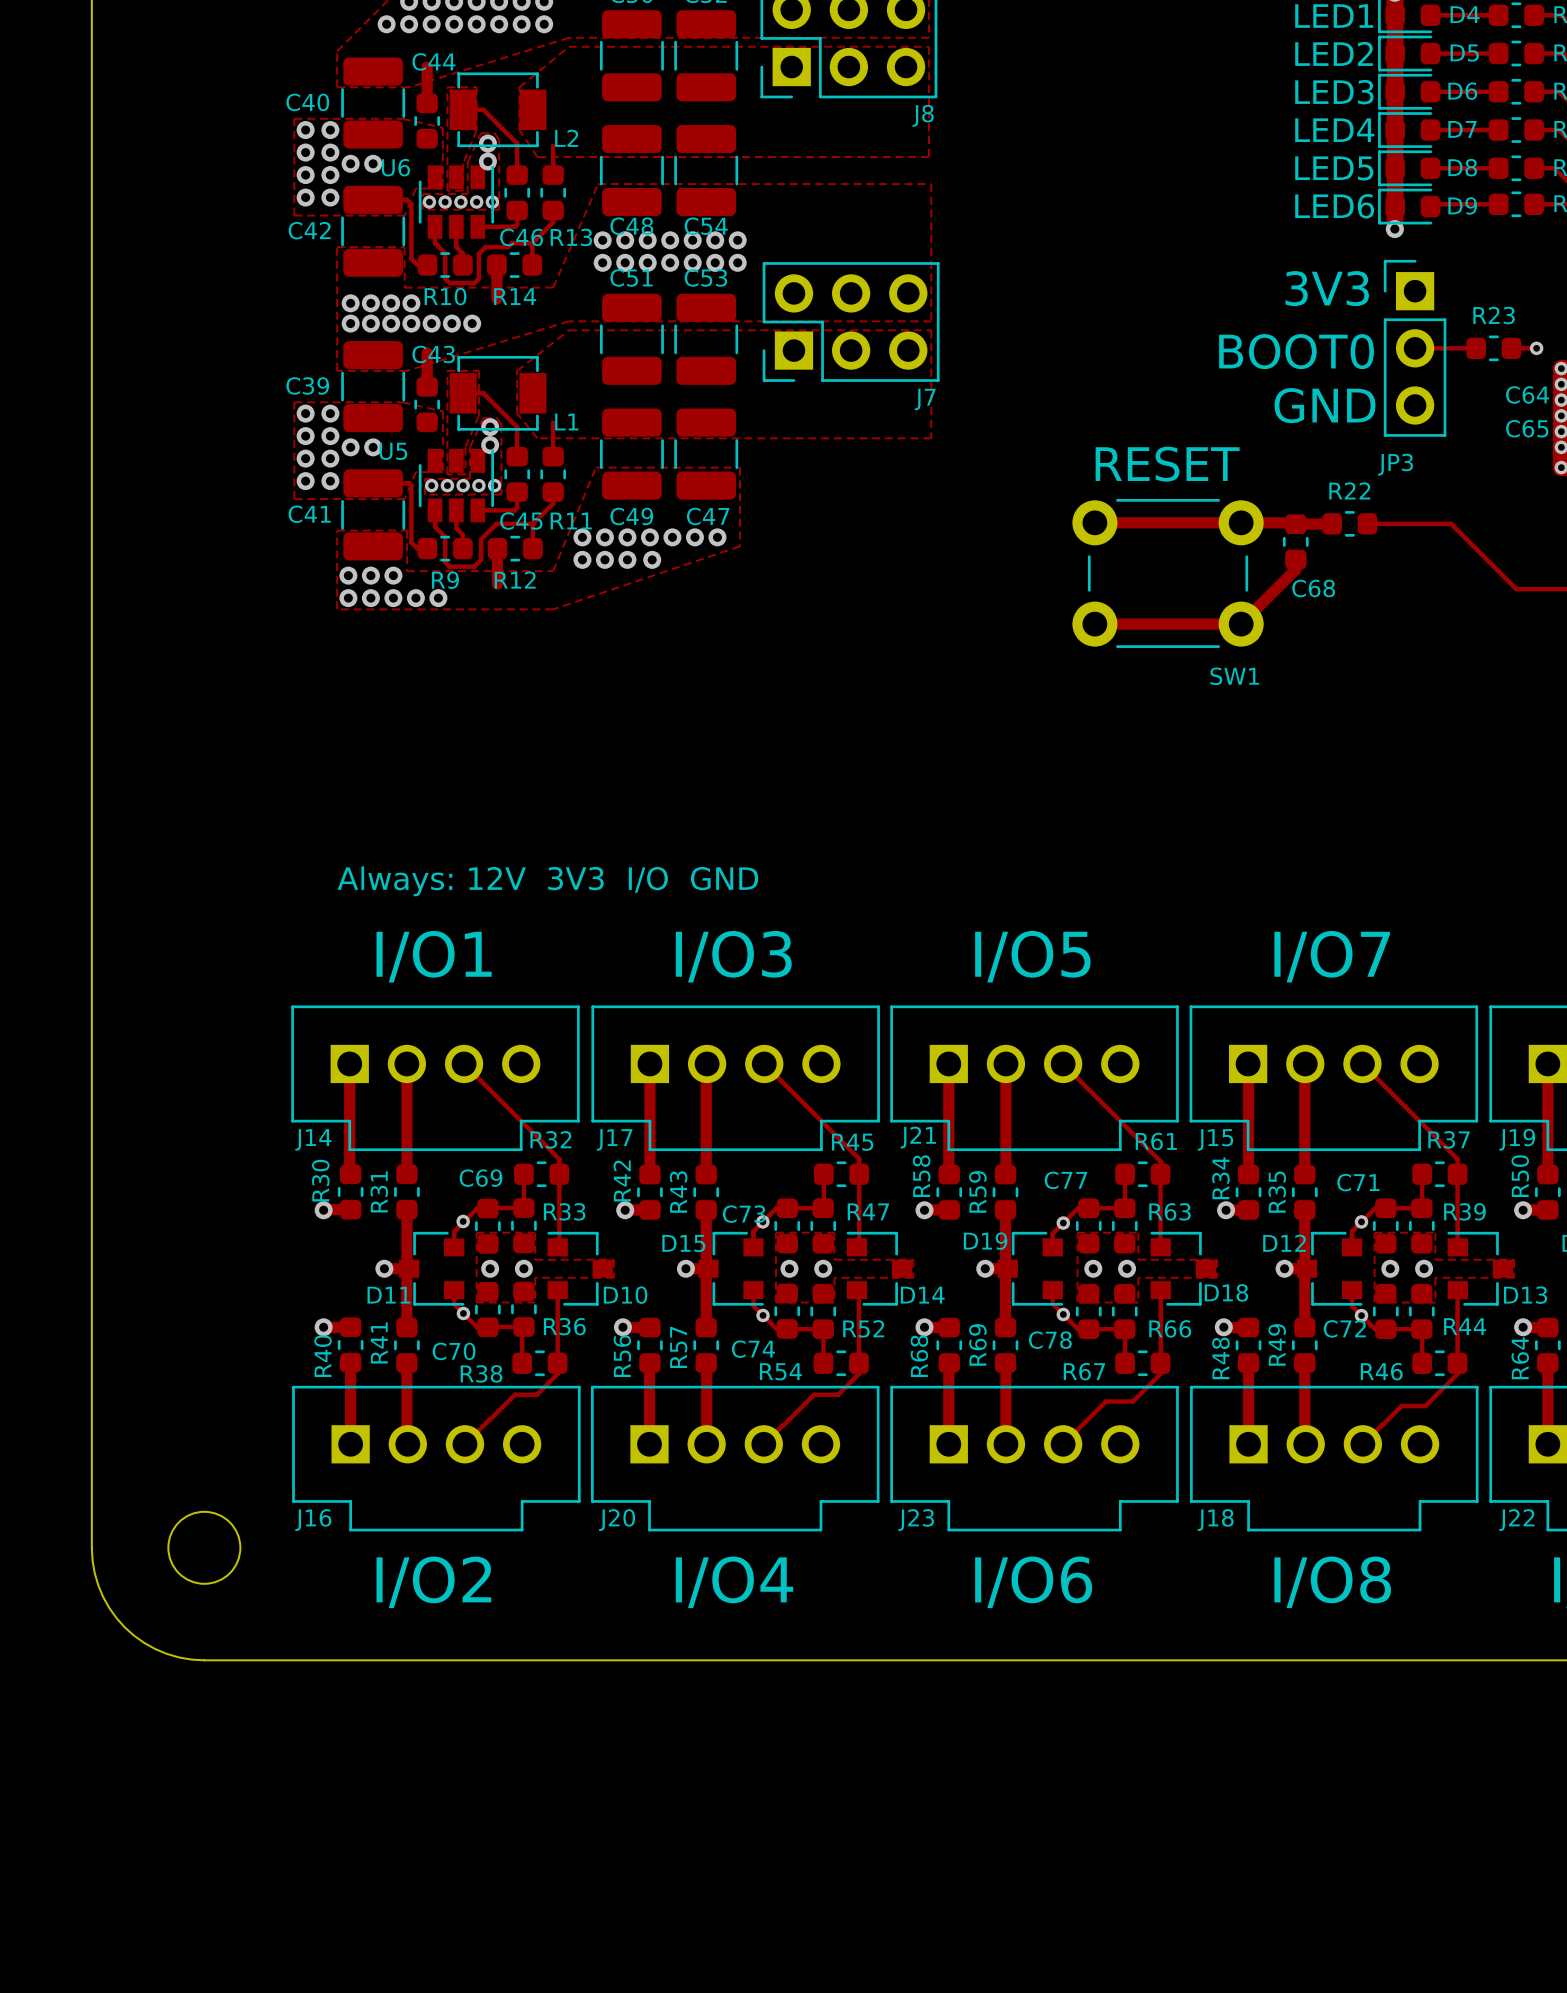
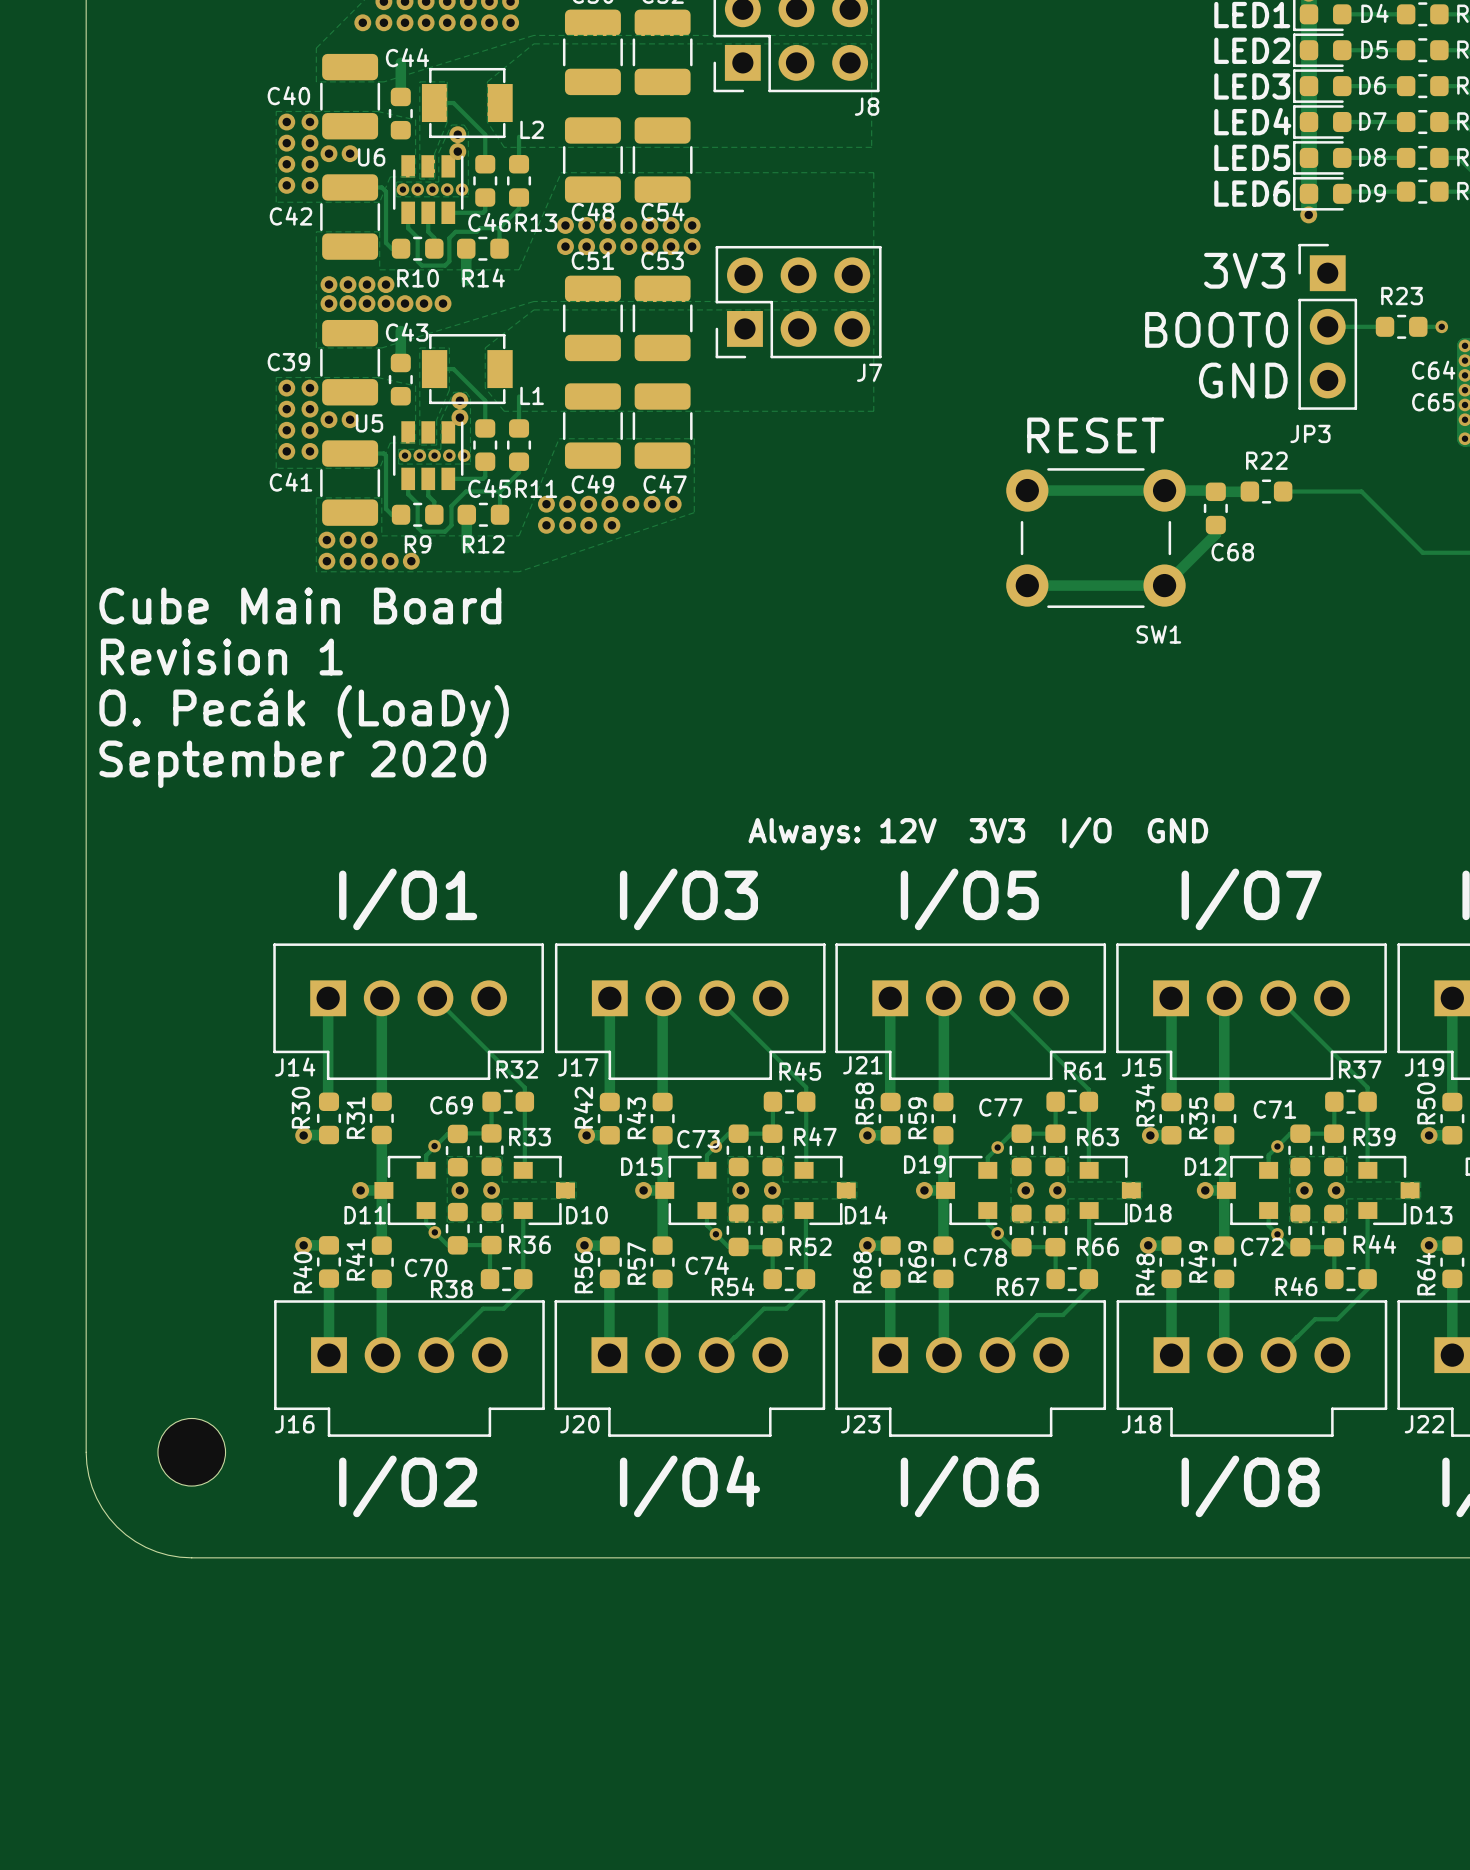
text: none -> Cube Main Board (300, 606)
text: none -> Revision 1 (221, 657)
text: none -> O. Pecák (LoaDy) (304, 711)
text: none -> September 2020 (292, 764)
text position: Always: 12V 3V3 I/O GND (547, 881) -> Always: 12V 3V3 I/O GND (978, 833)

